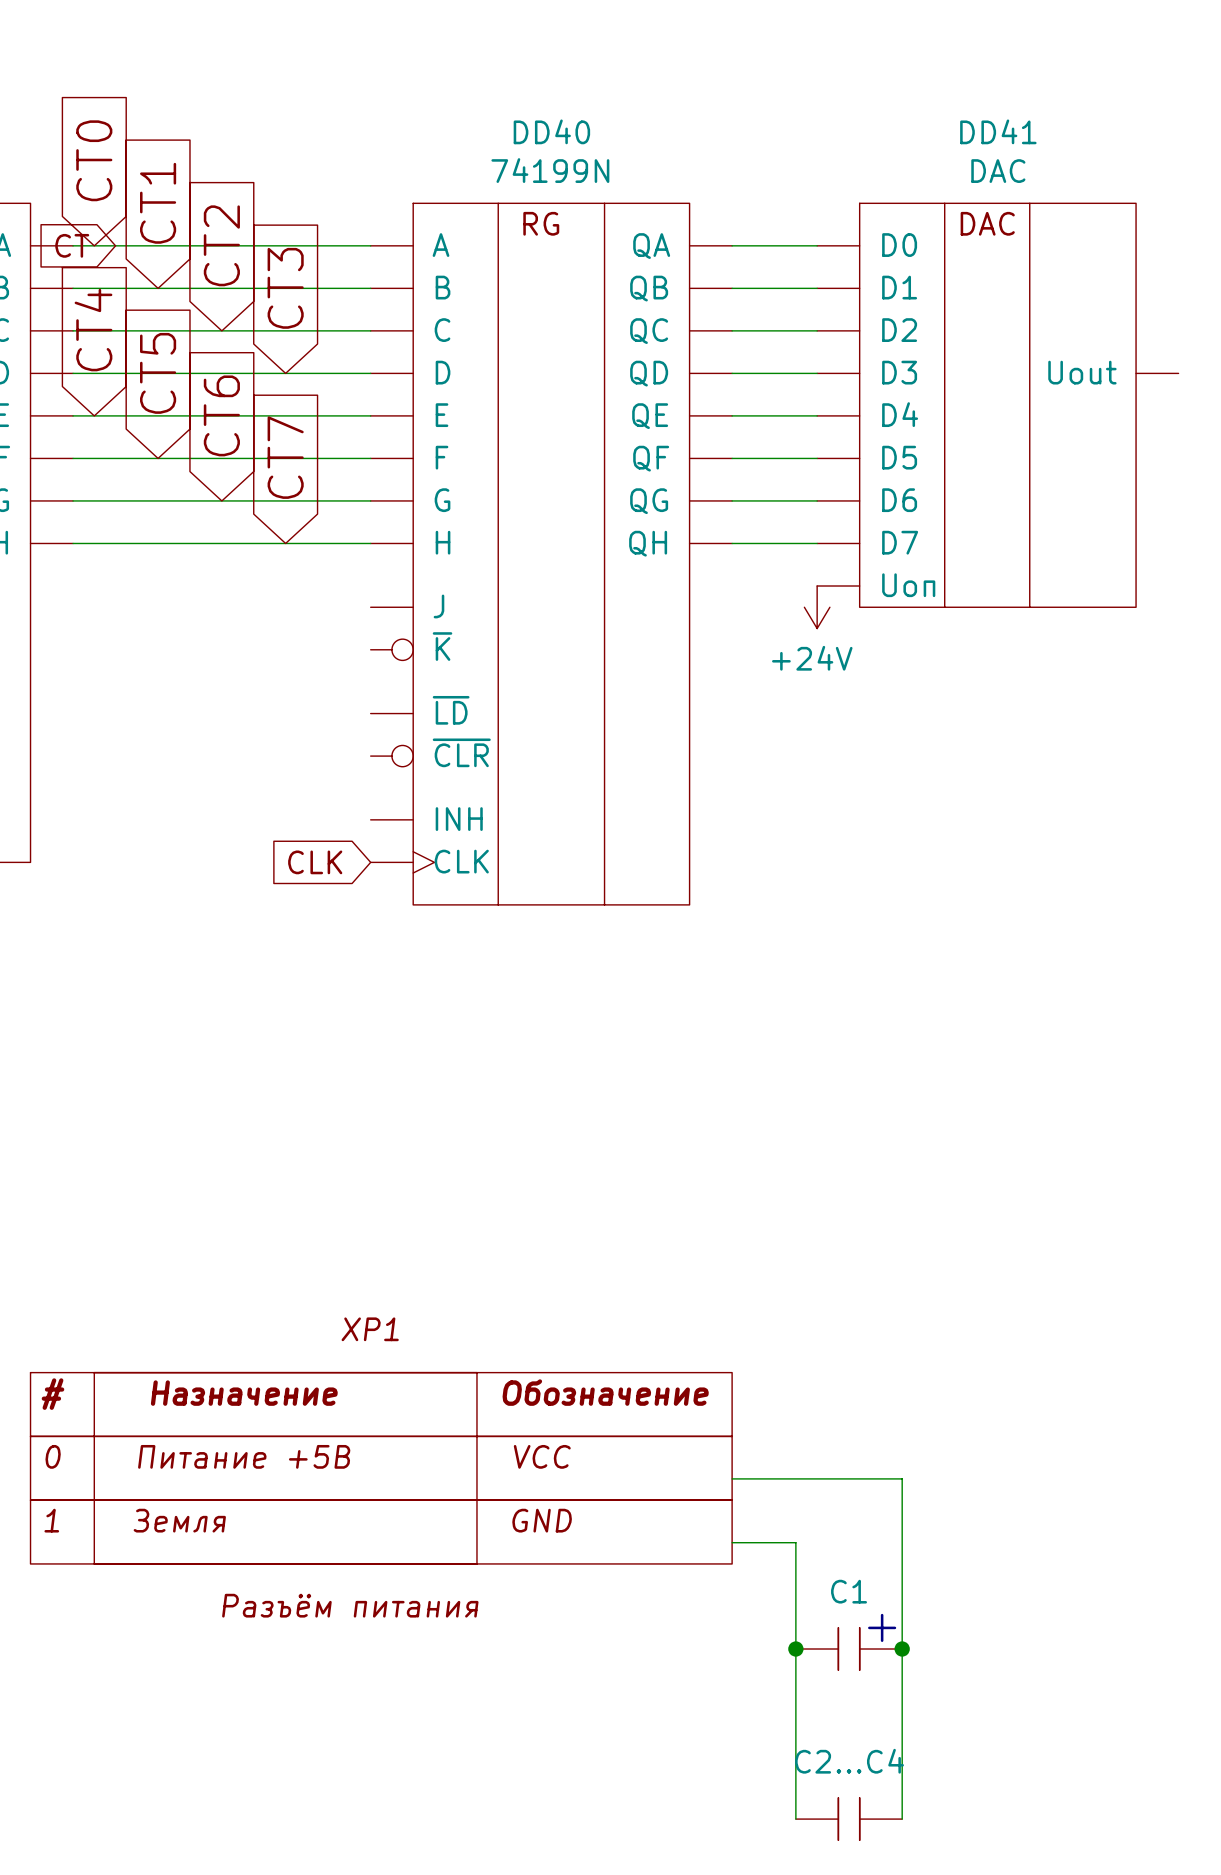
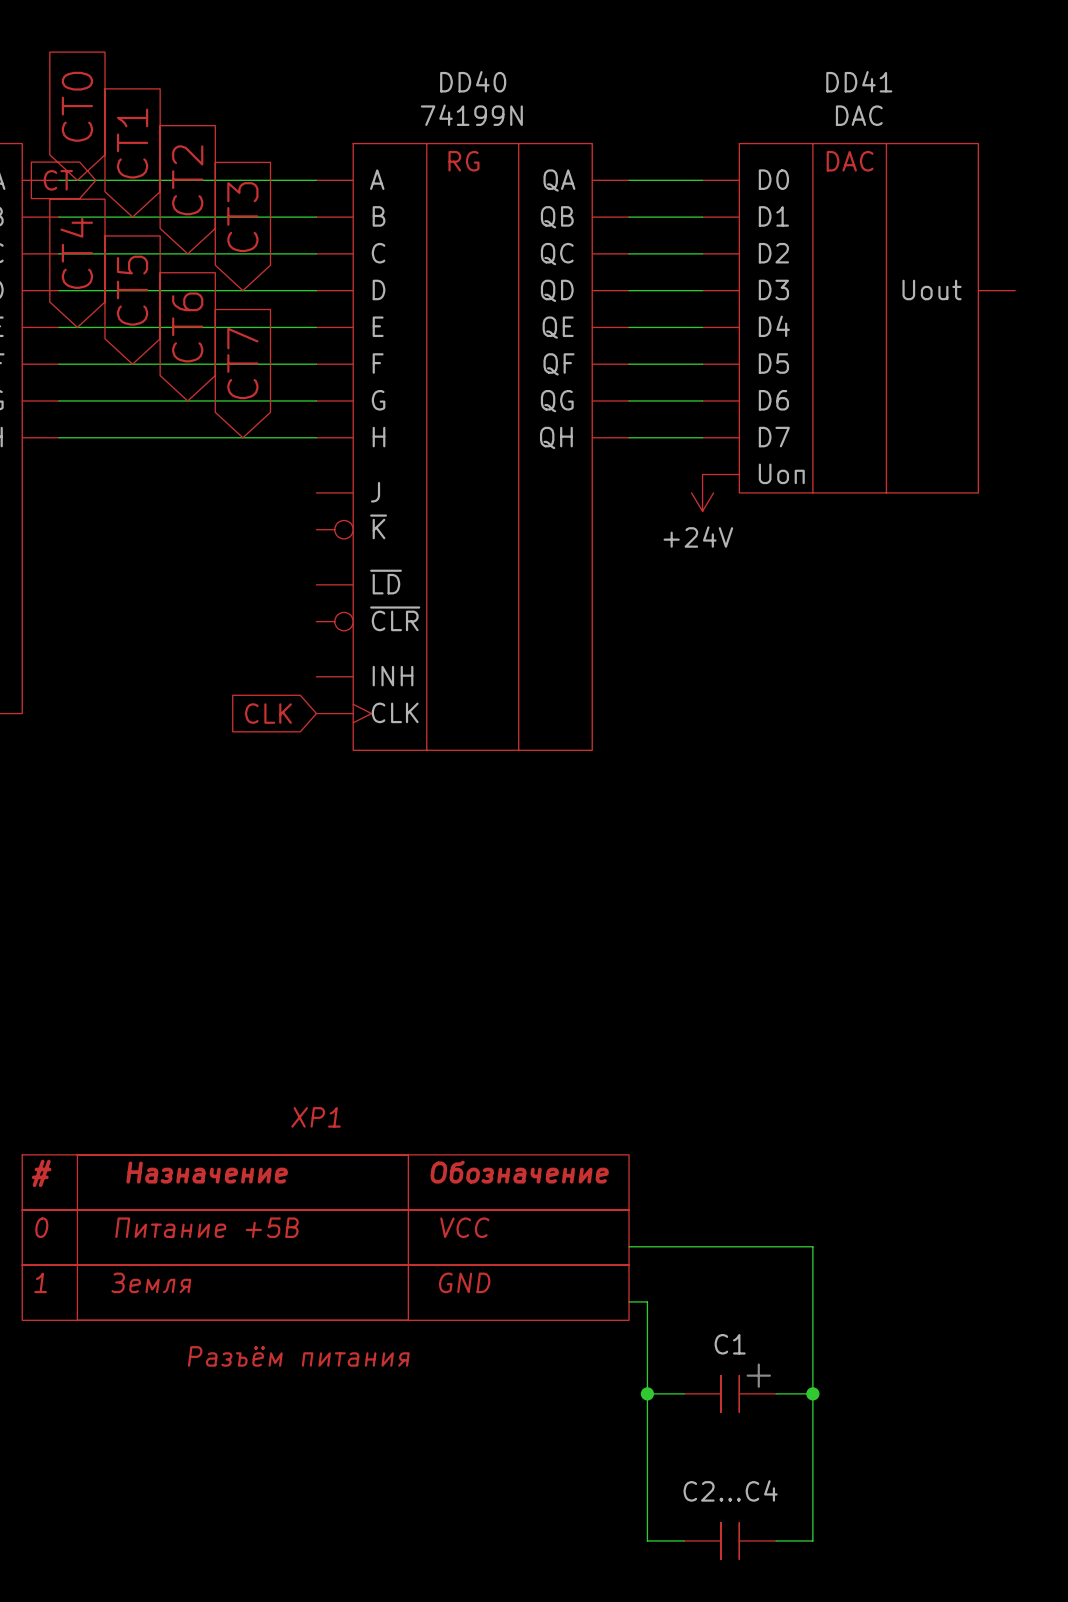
wire: (902, 1478) (902, 1819) -> (776, 1246) (812, 1246) (812, 1540) (776, 1540)
wire: (753, 1542) (795, 1542) (795, 1819) -> (647, 1301) (647, 1540) (684, 1540)
wire: none -> (647, 1393) (684, 1393)
junction position: (795, 1649) -> (647, 1393)
wire: none -> (776, 1393) (812, 1393)
junction position: (902, 1649) -> (812, 1393)

